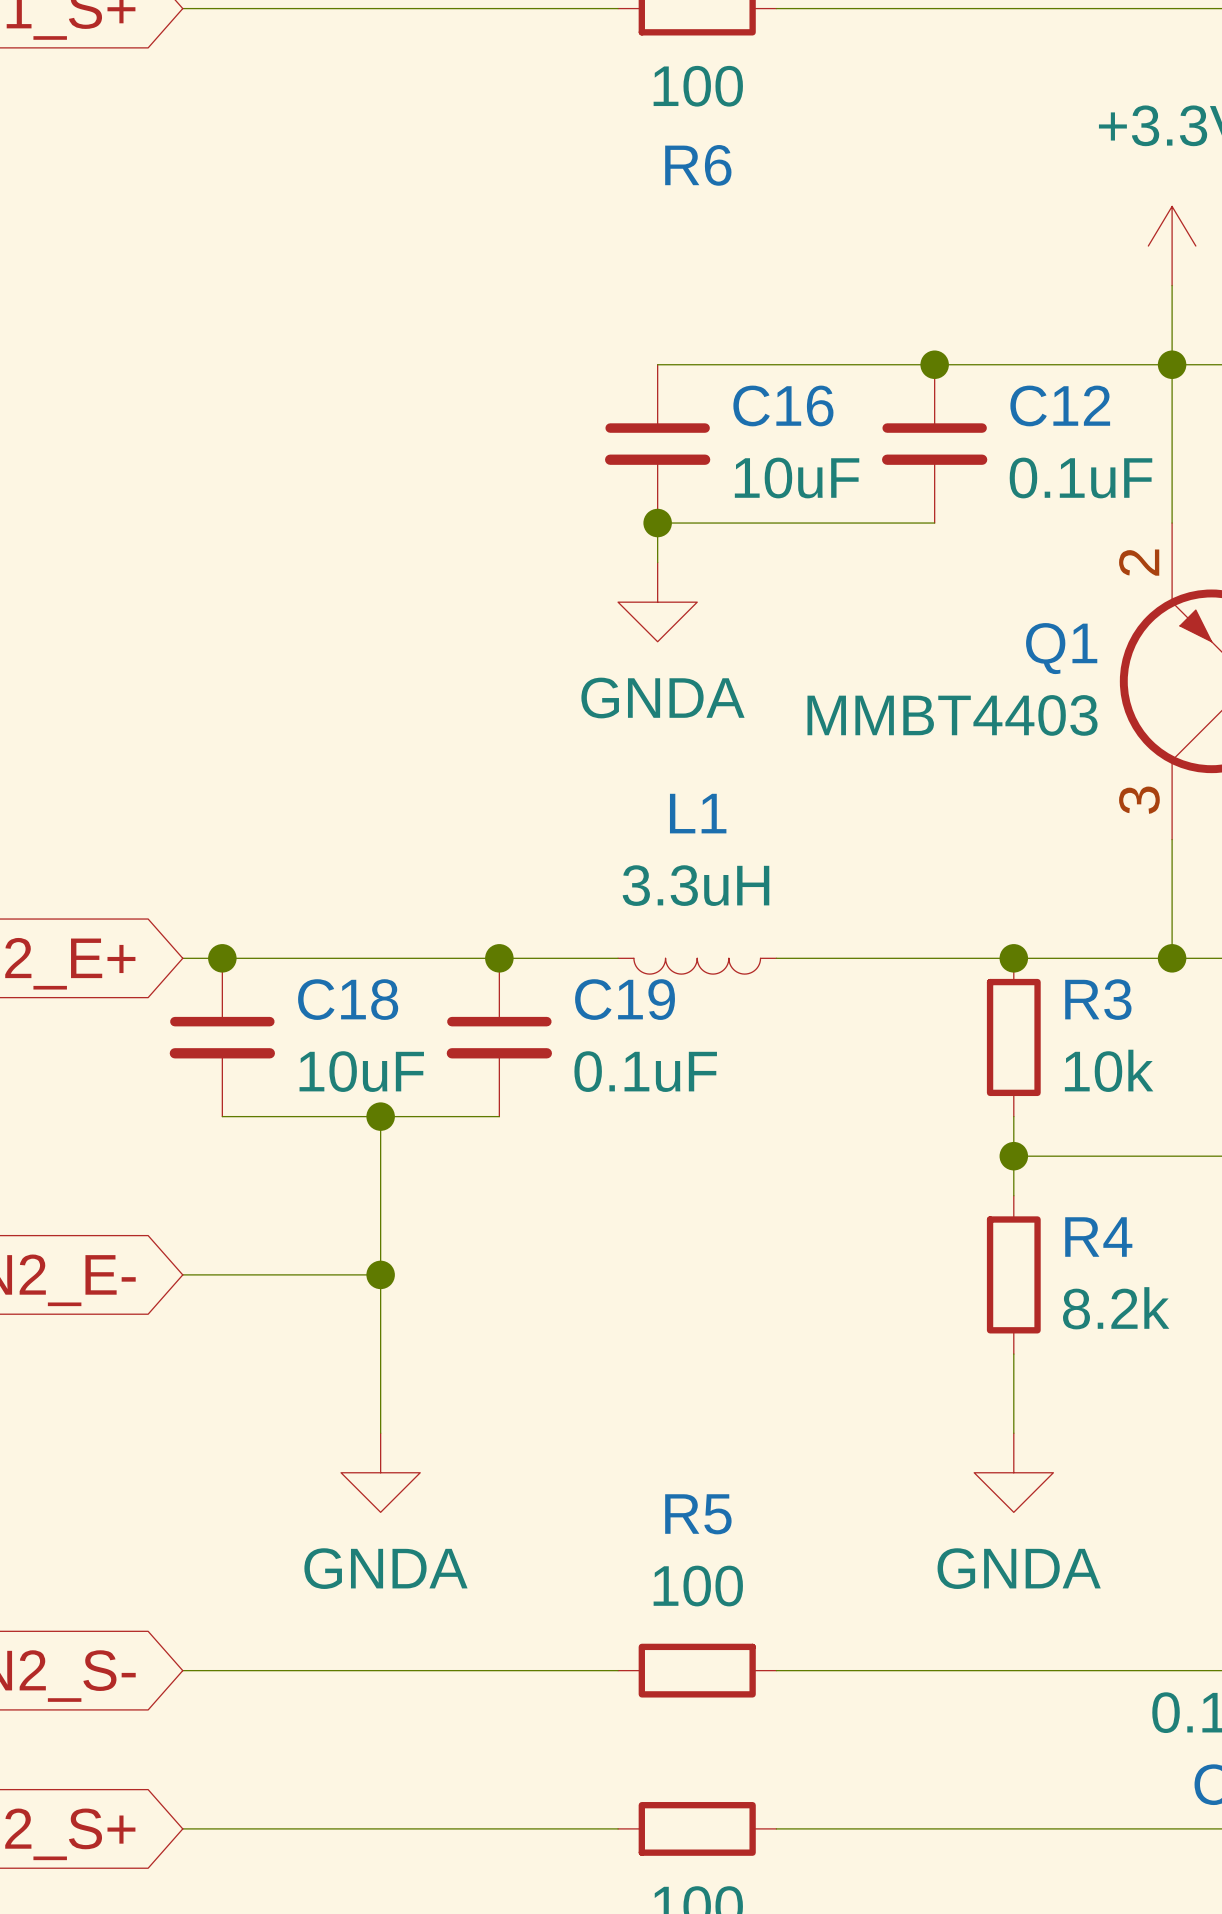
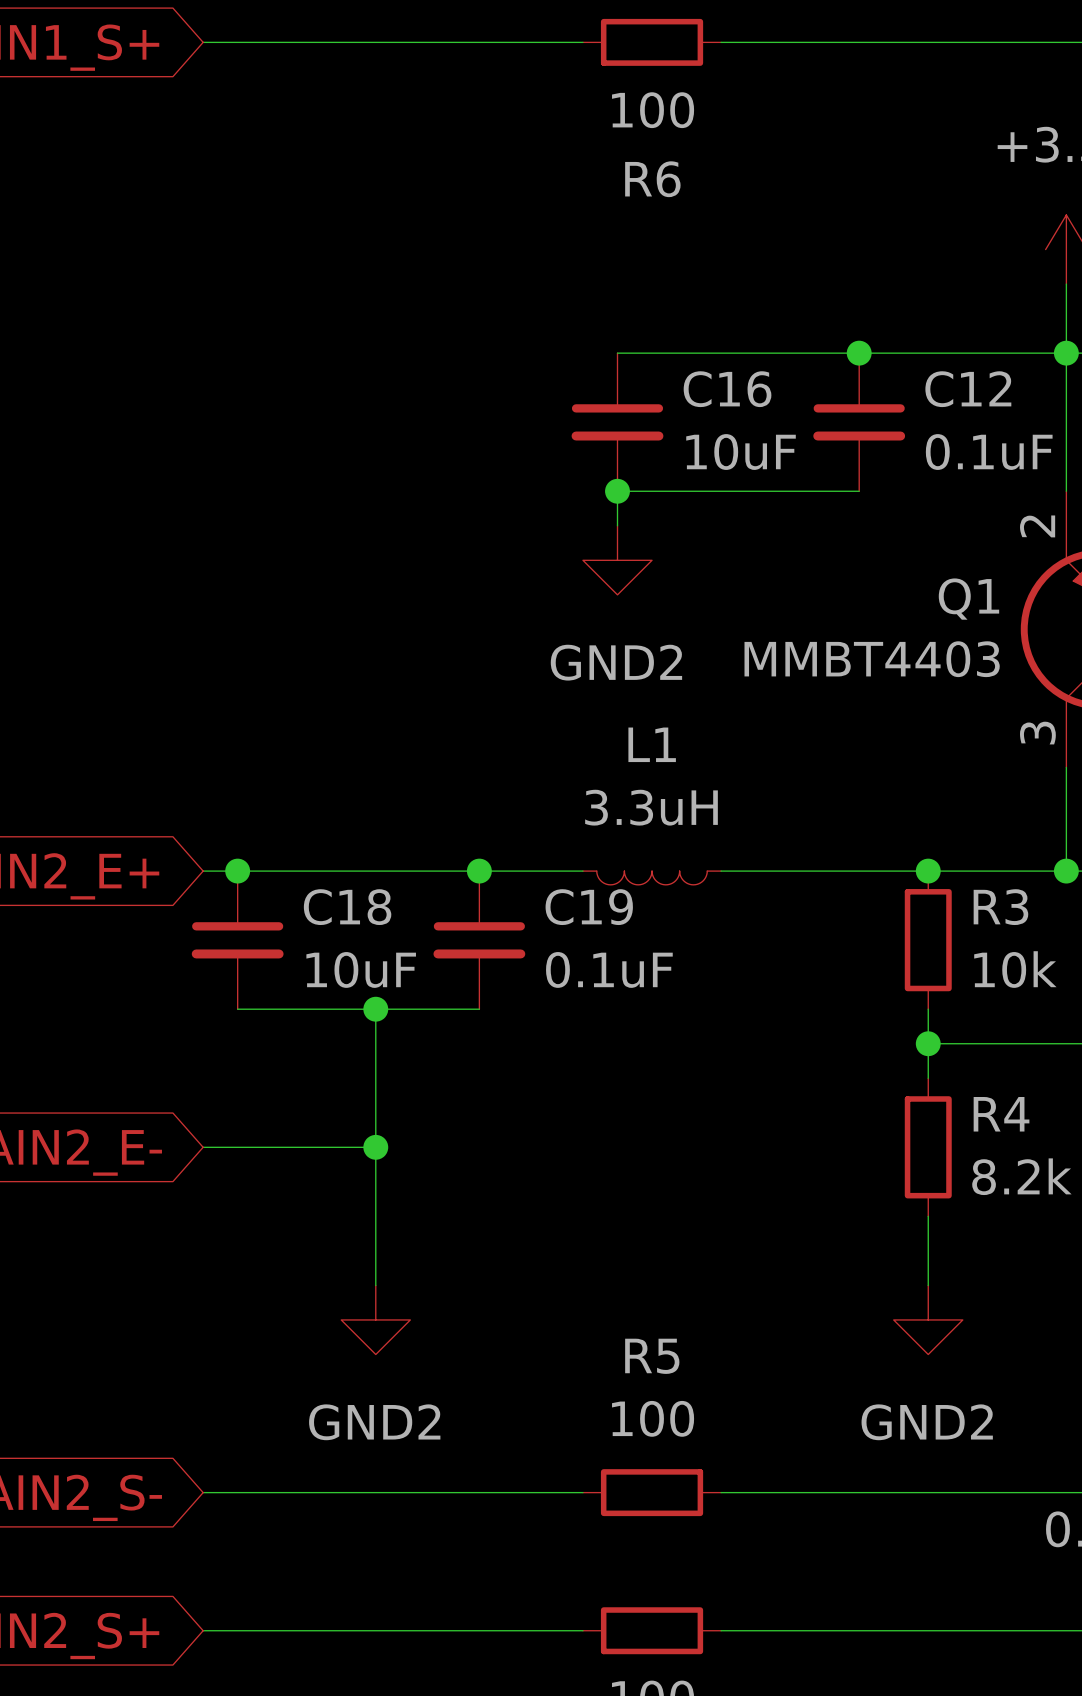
power symbol: GNDA (657, 602) -> GND2 (617, 560)
power symbol: GNDA (380, 1472) -> GND2 (375, 1319)
power symbol: GNDA (1013, 1472) -> GND2 (928, 1319)

